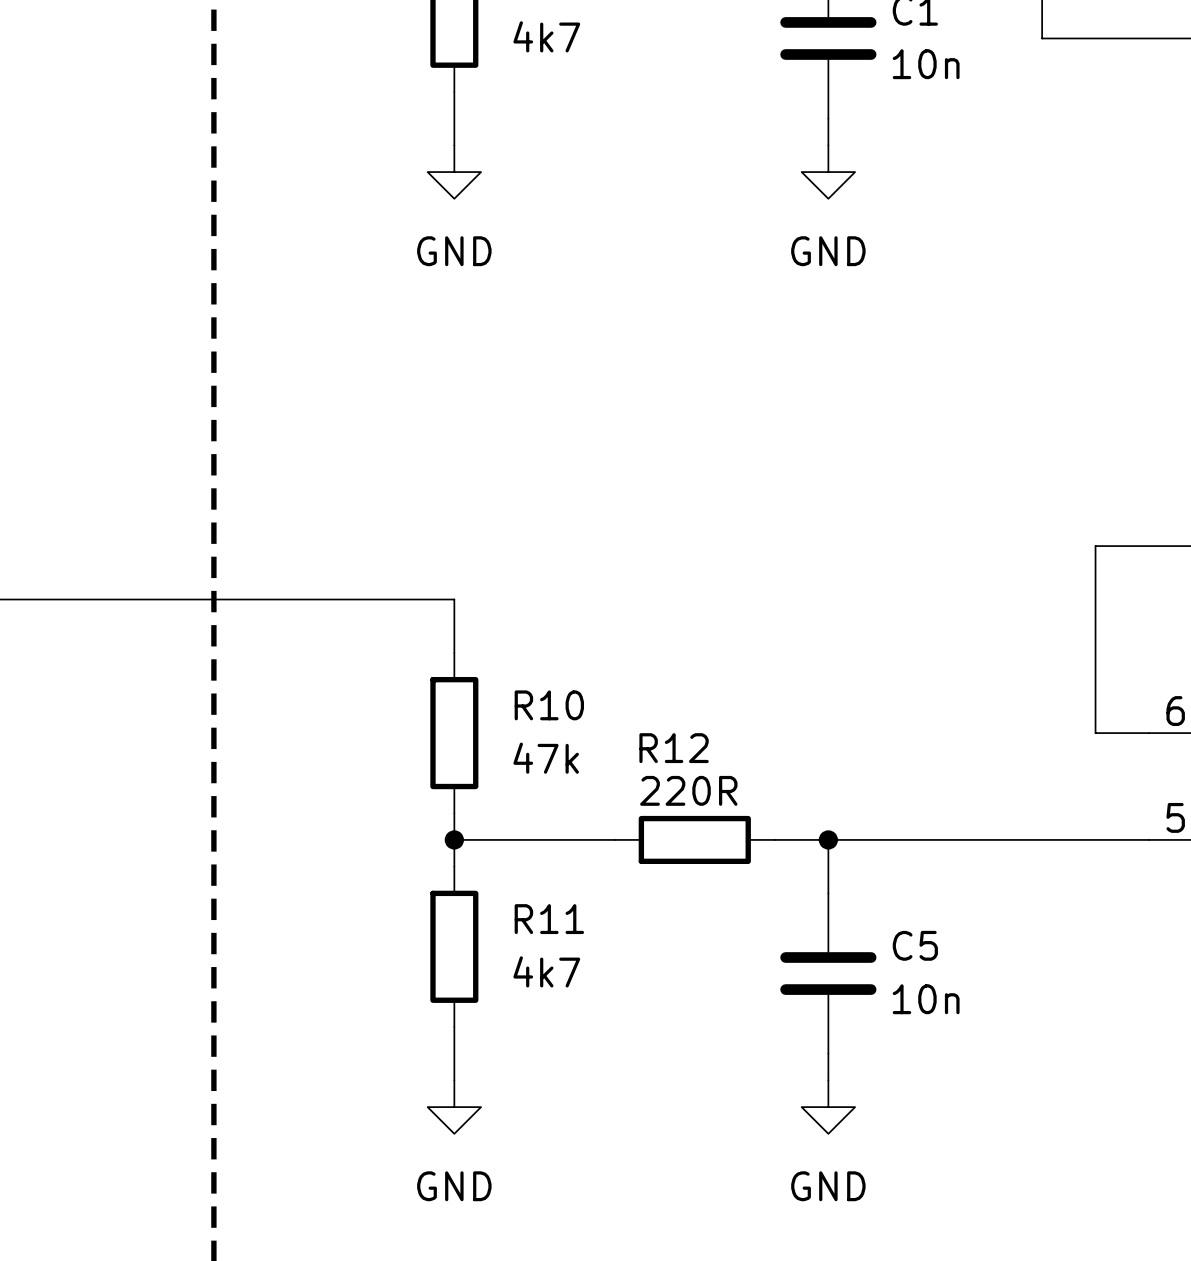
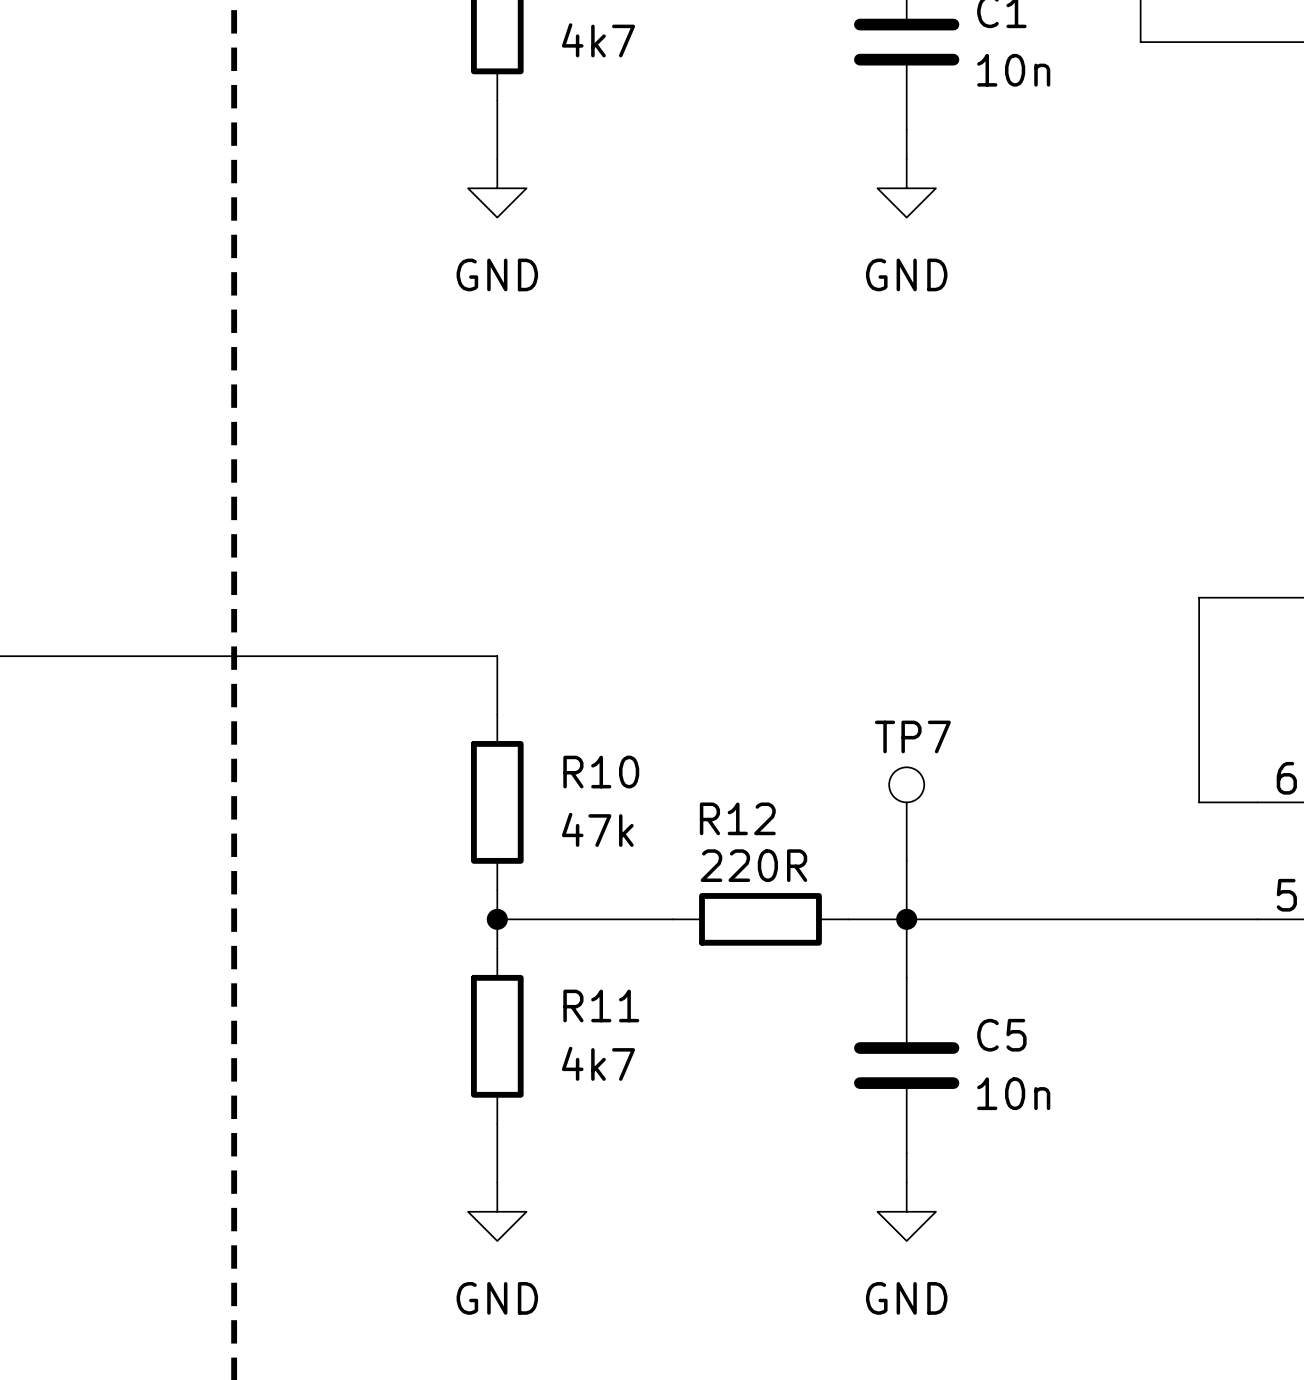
TP7: none -> (906, 814)
wire: none -> (906, 860) (906, 919)

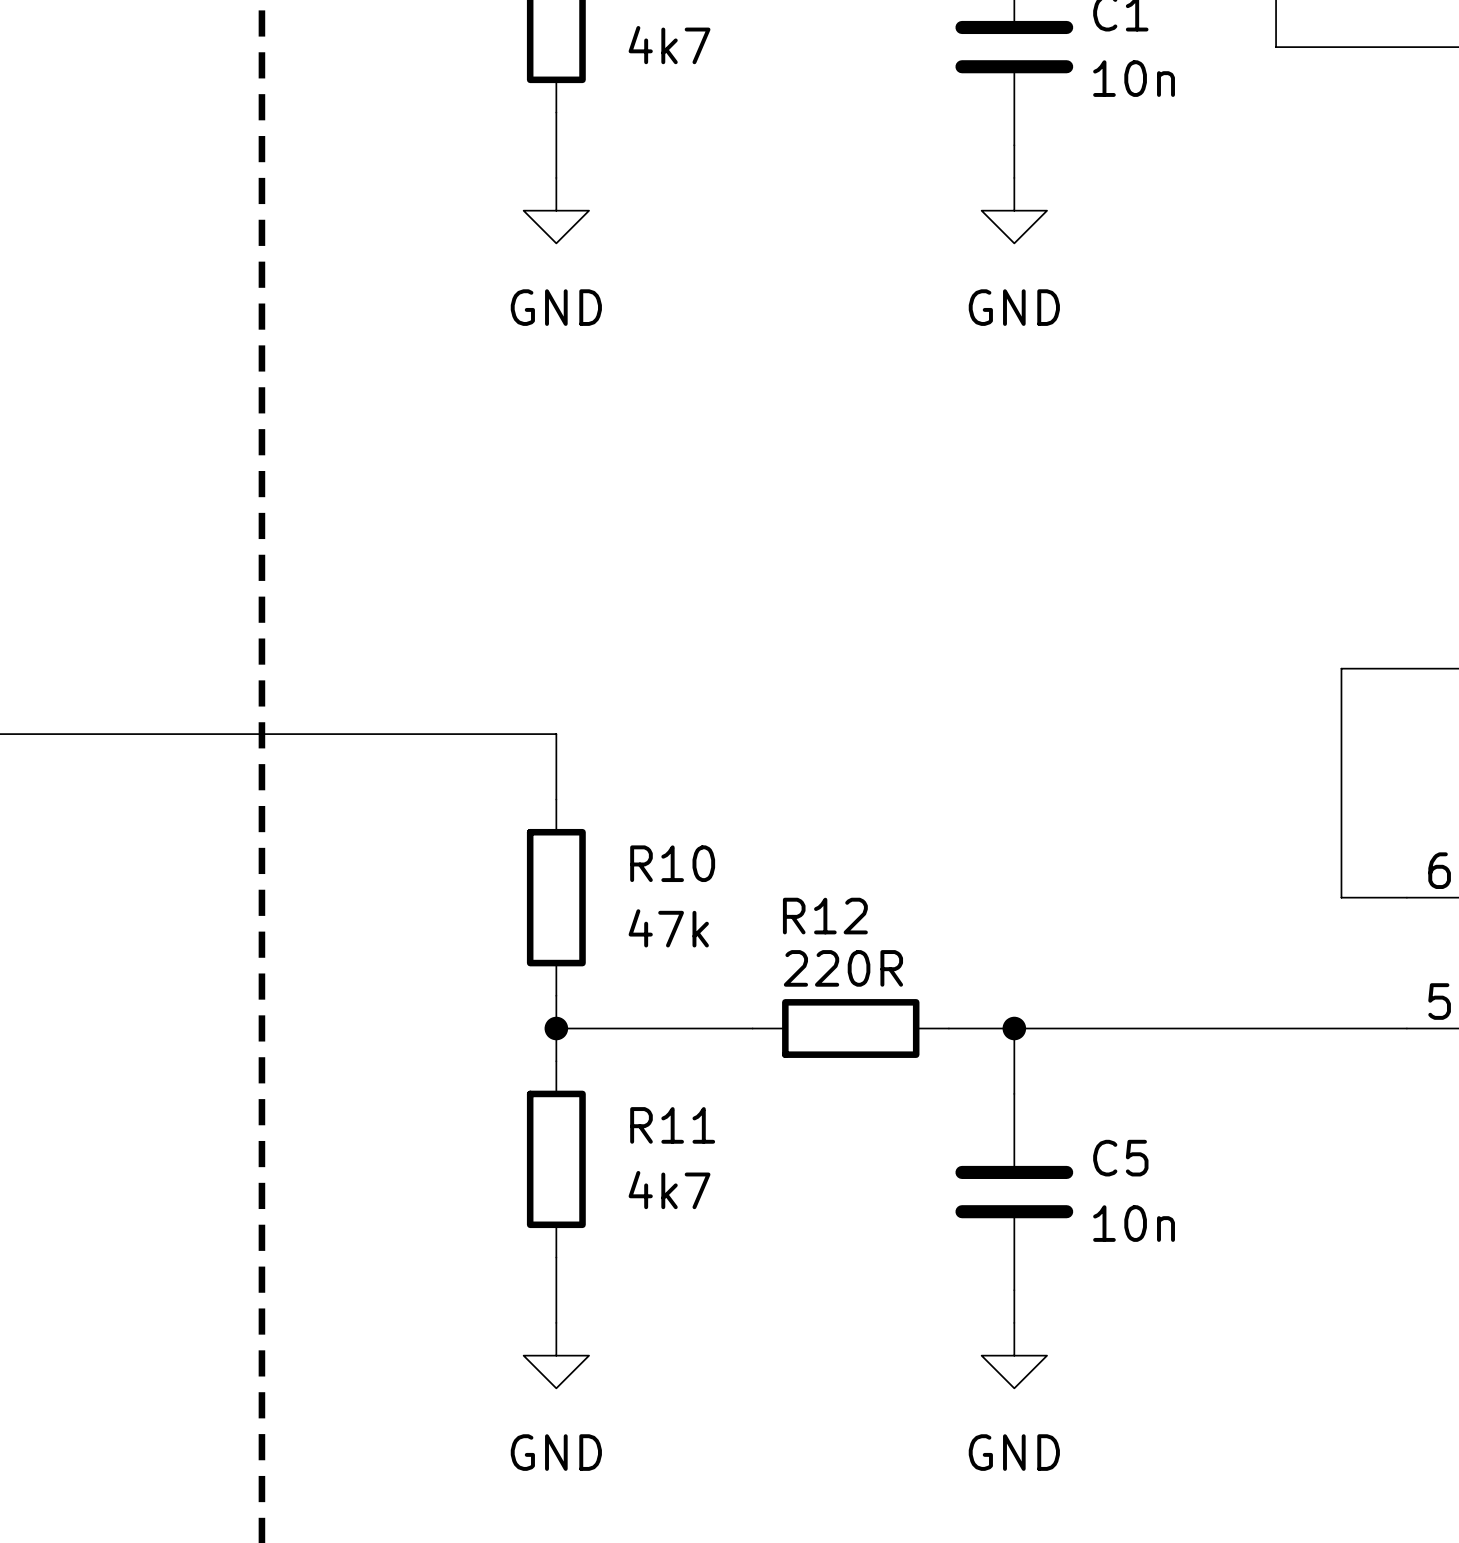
TP7: (906, 814) -> none
wire: (906, 860) (906, 919) -> none

